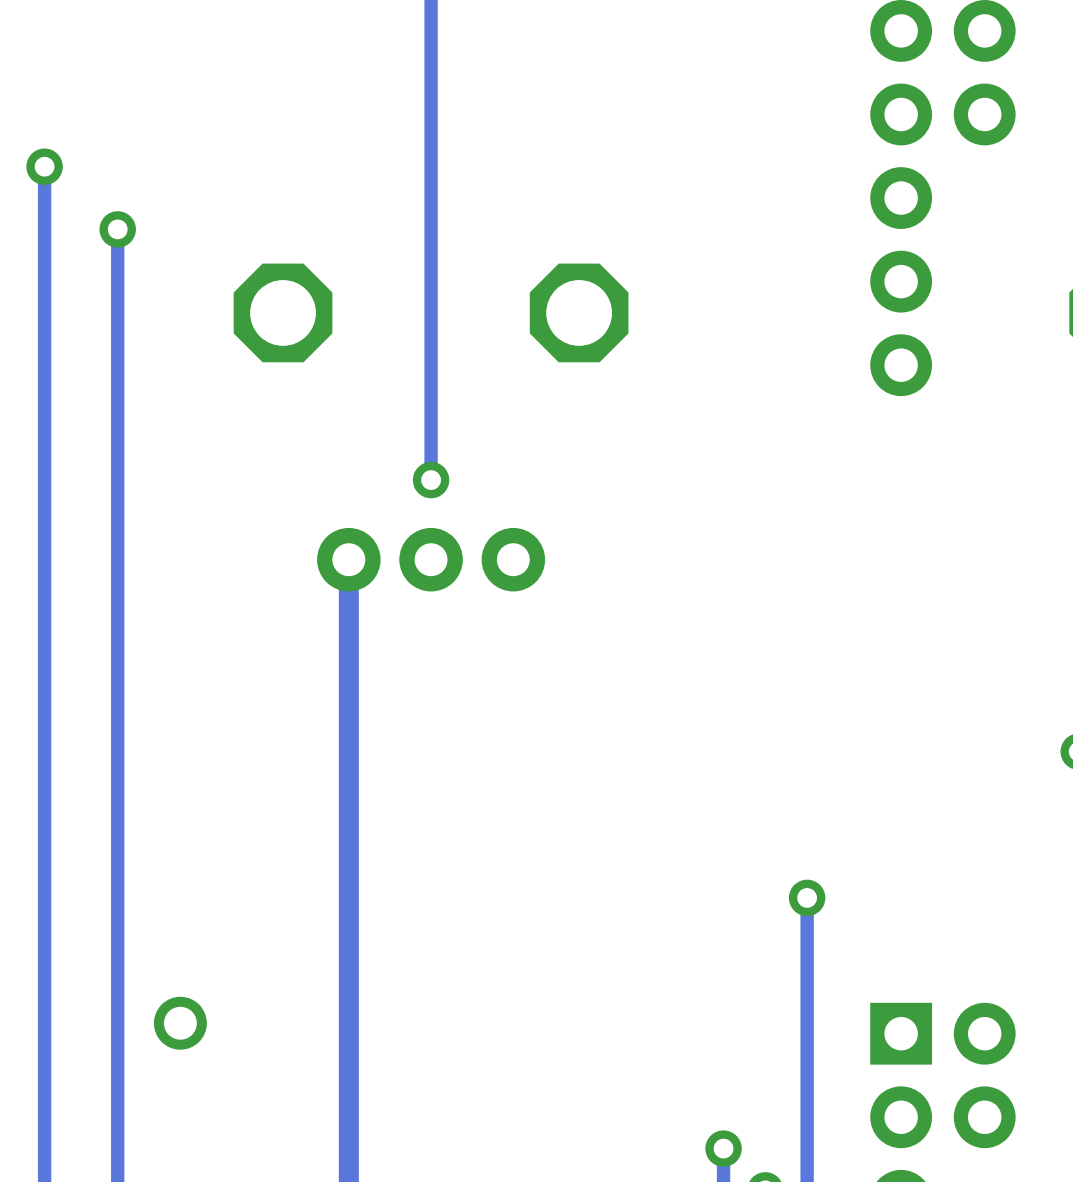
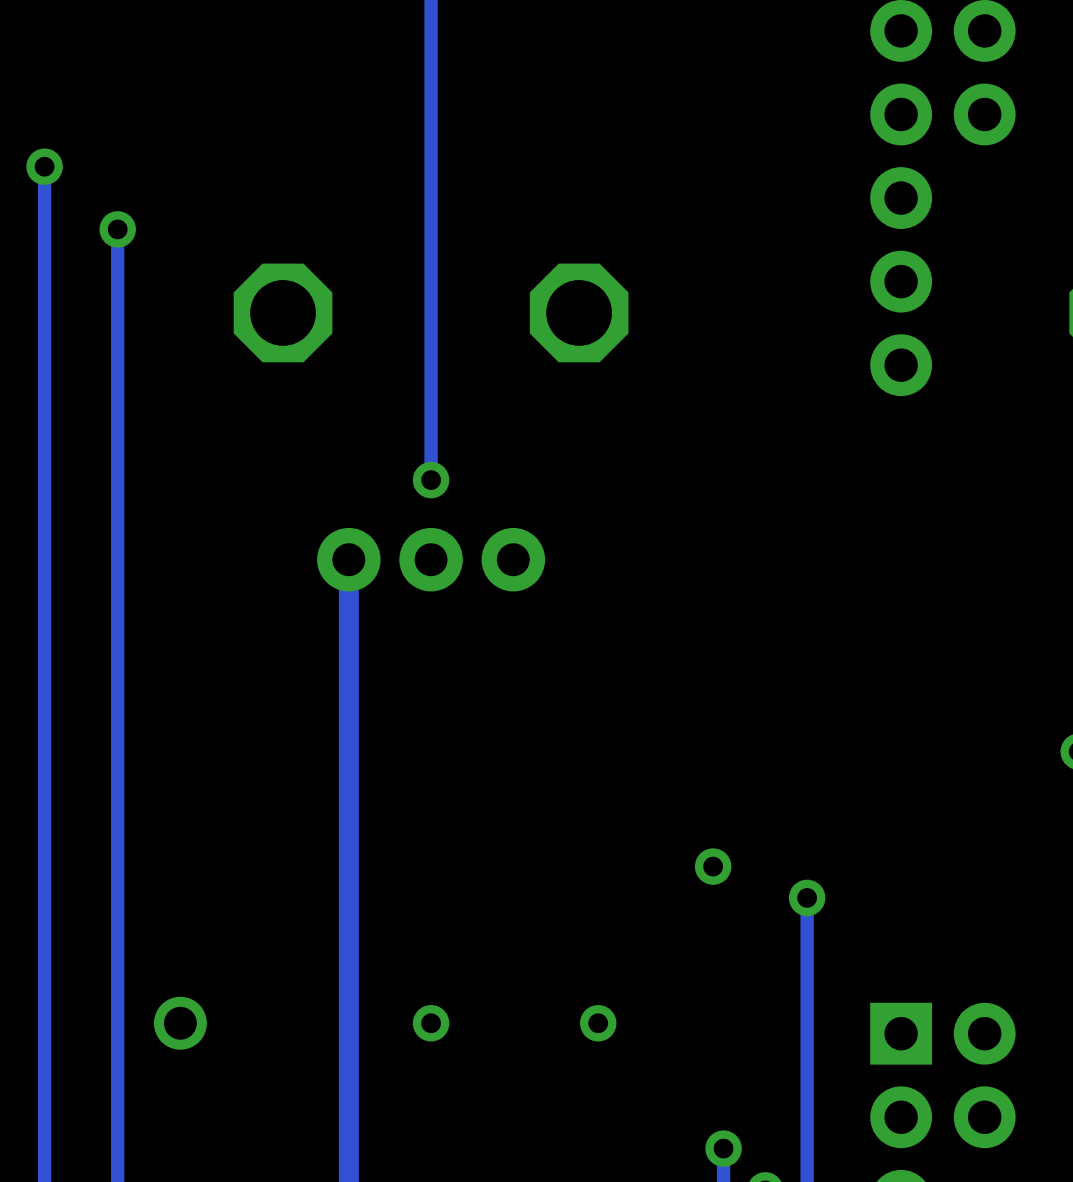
via: none -> (713, 866)
via: none -> (431, 1023)
via: none -> (598, 1023)

